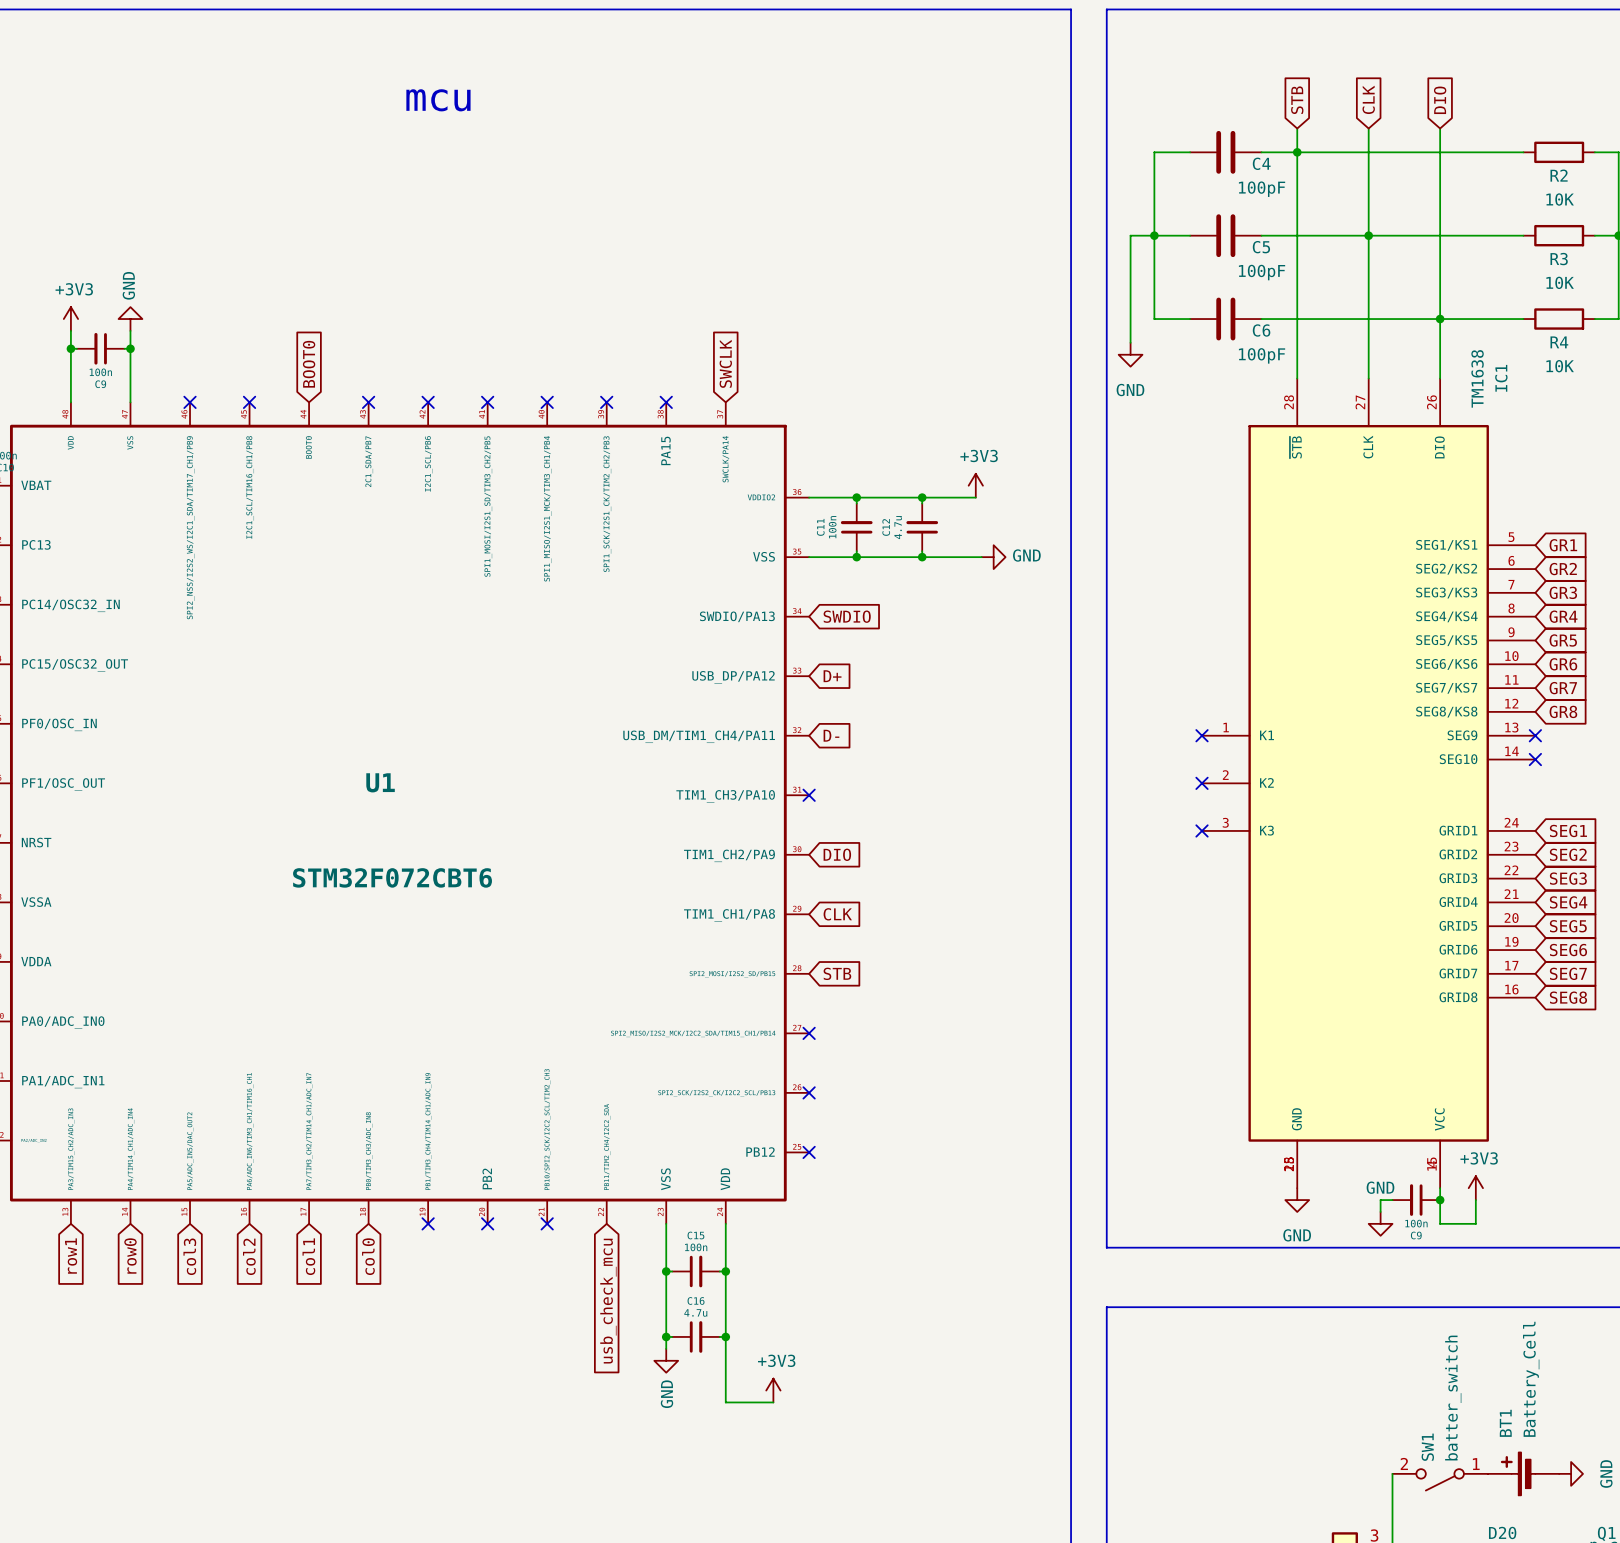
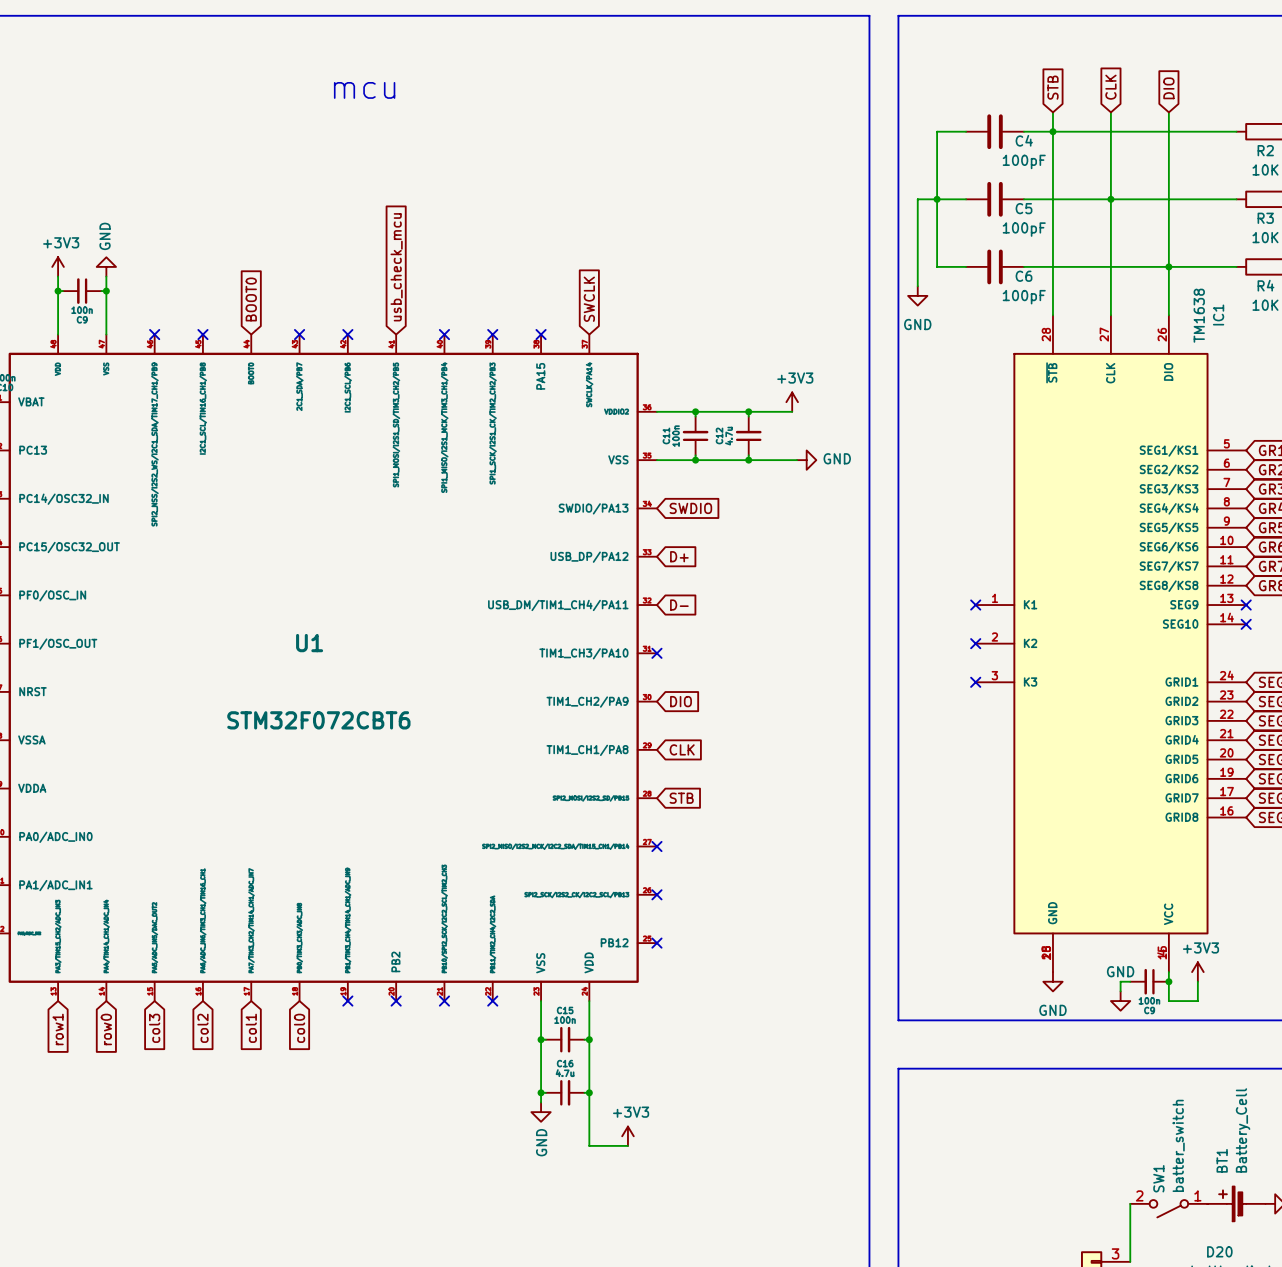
global label: none -> usb_check_mcu (396, 267)
no-connect mark: (487, 402) -> none
no-connect mark: none -> (492, 1001)
global label: usb_check_mcu (608, 1301) -> none

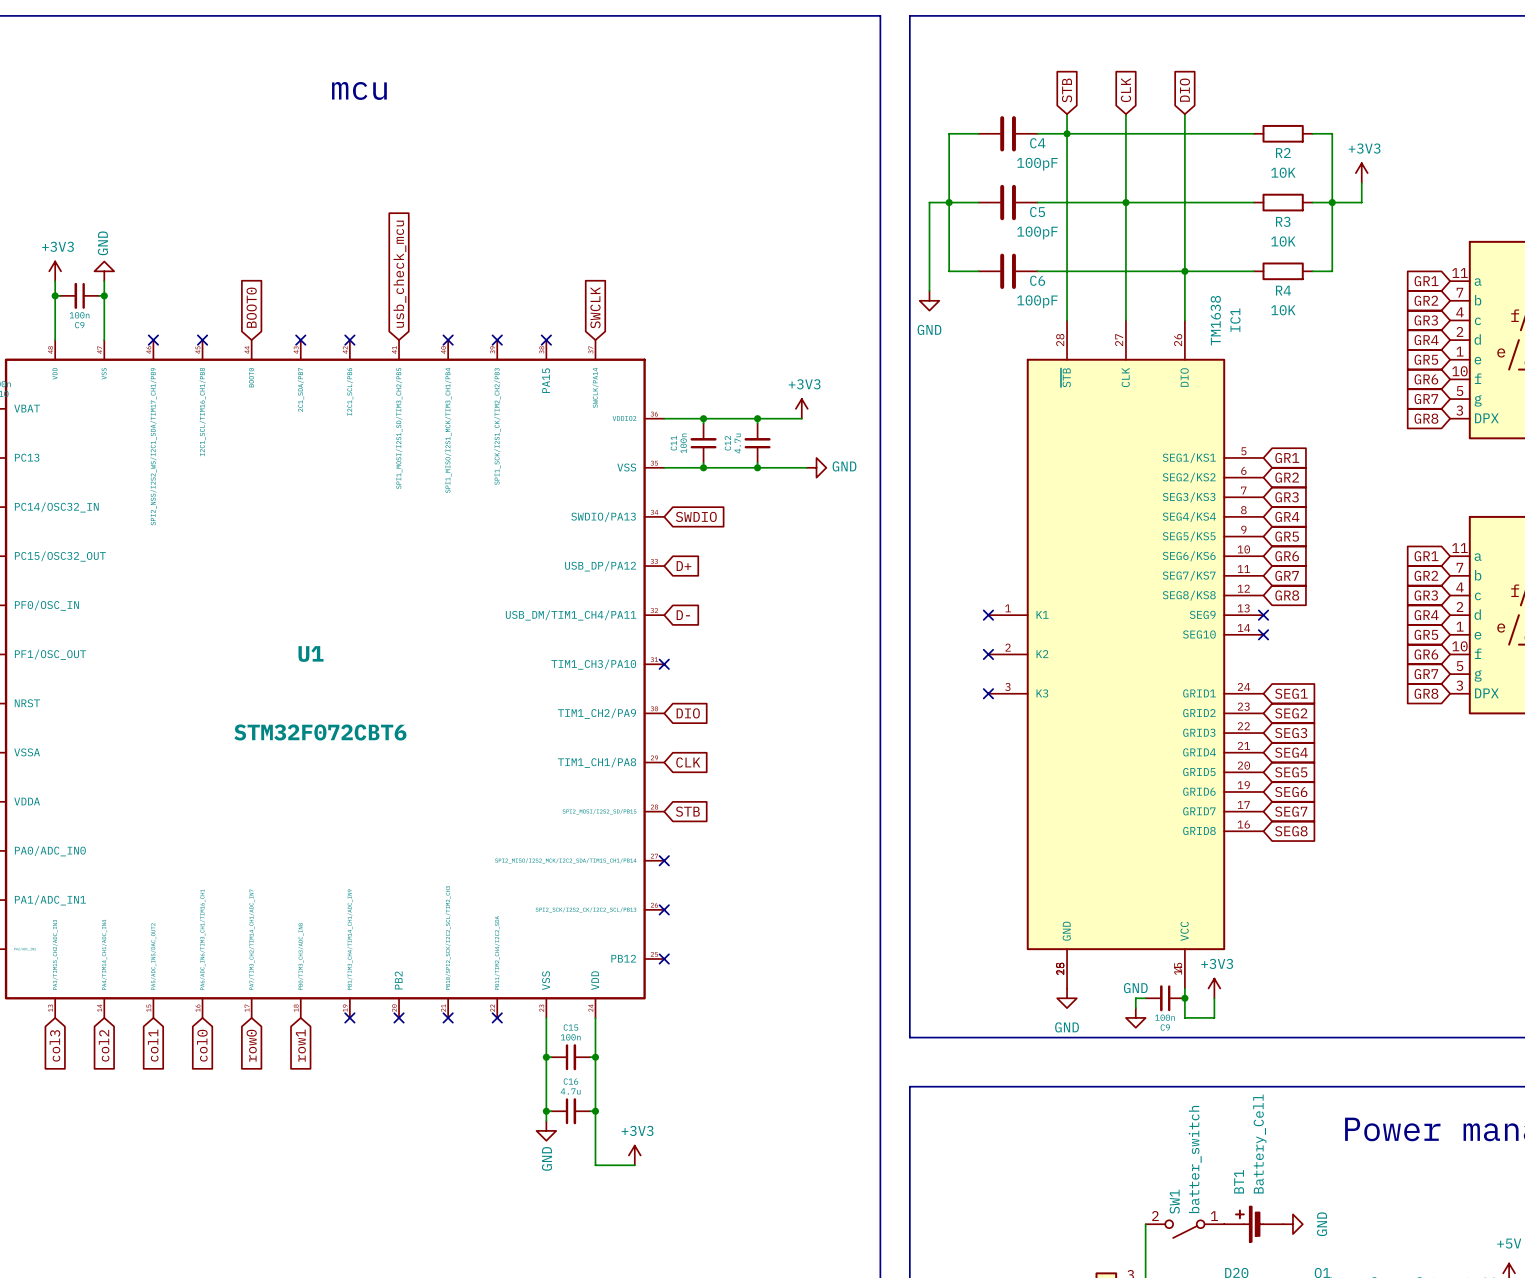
global label: col3 (154, 1028) -> col1 (153, 1045)
global label: col2 (202, 1028) -> col0 (202, 1045)
global label: col1 (251, 1028) -> row0 (251, 1045)
global label: col0 (299, 1028) -> row1 (300, 1045)
global label: row1 (58, 1029) -> col3 (54, 1045)
global label: row0 (106, 1029) -> col2 (104, 1045)

